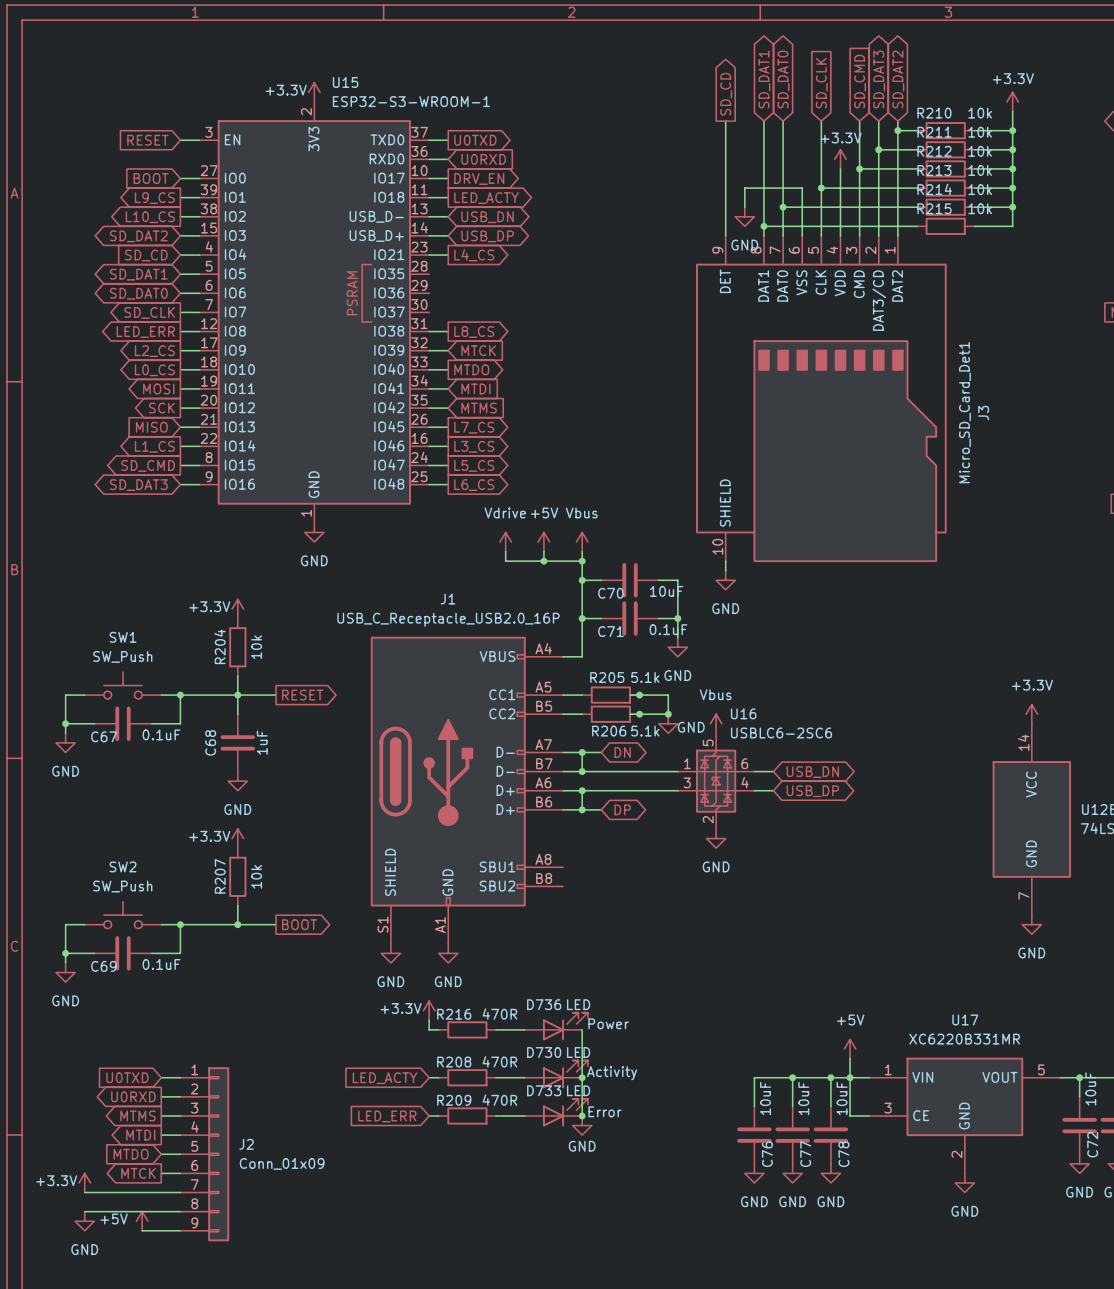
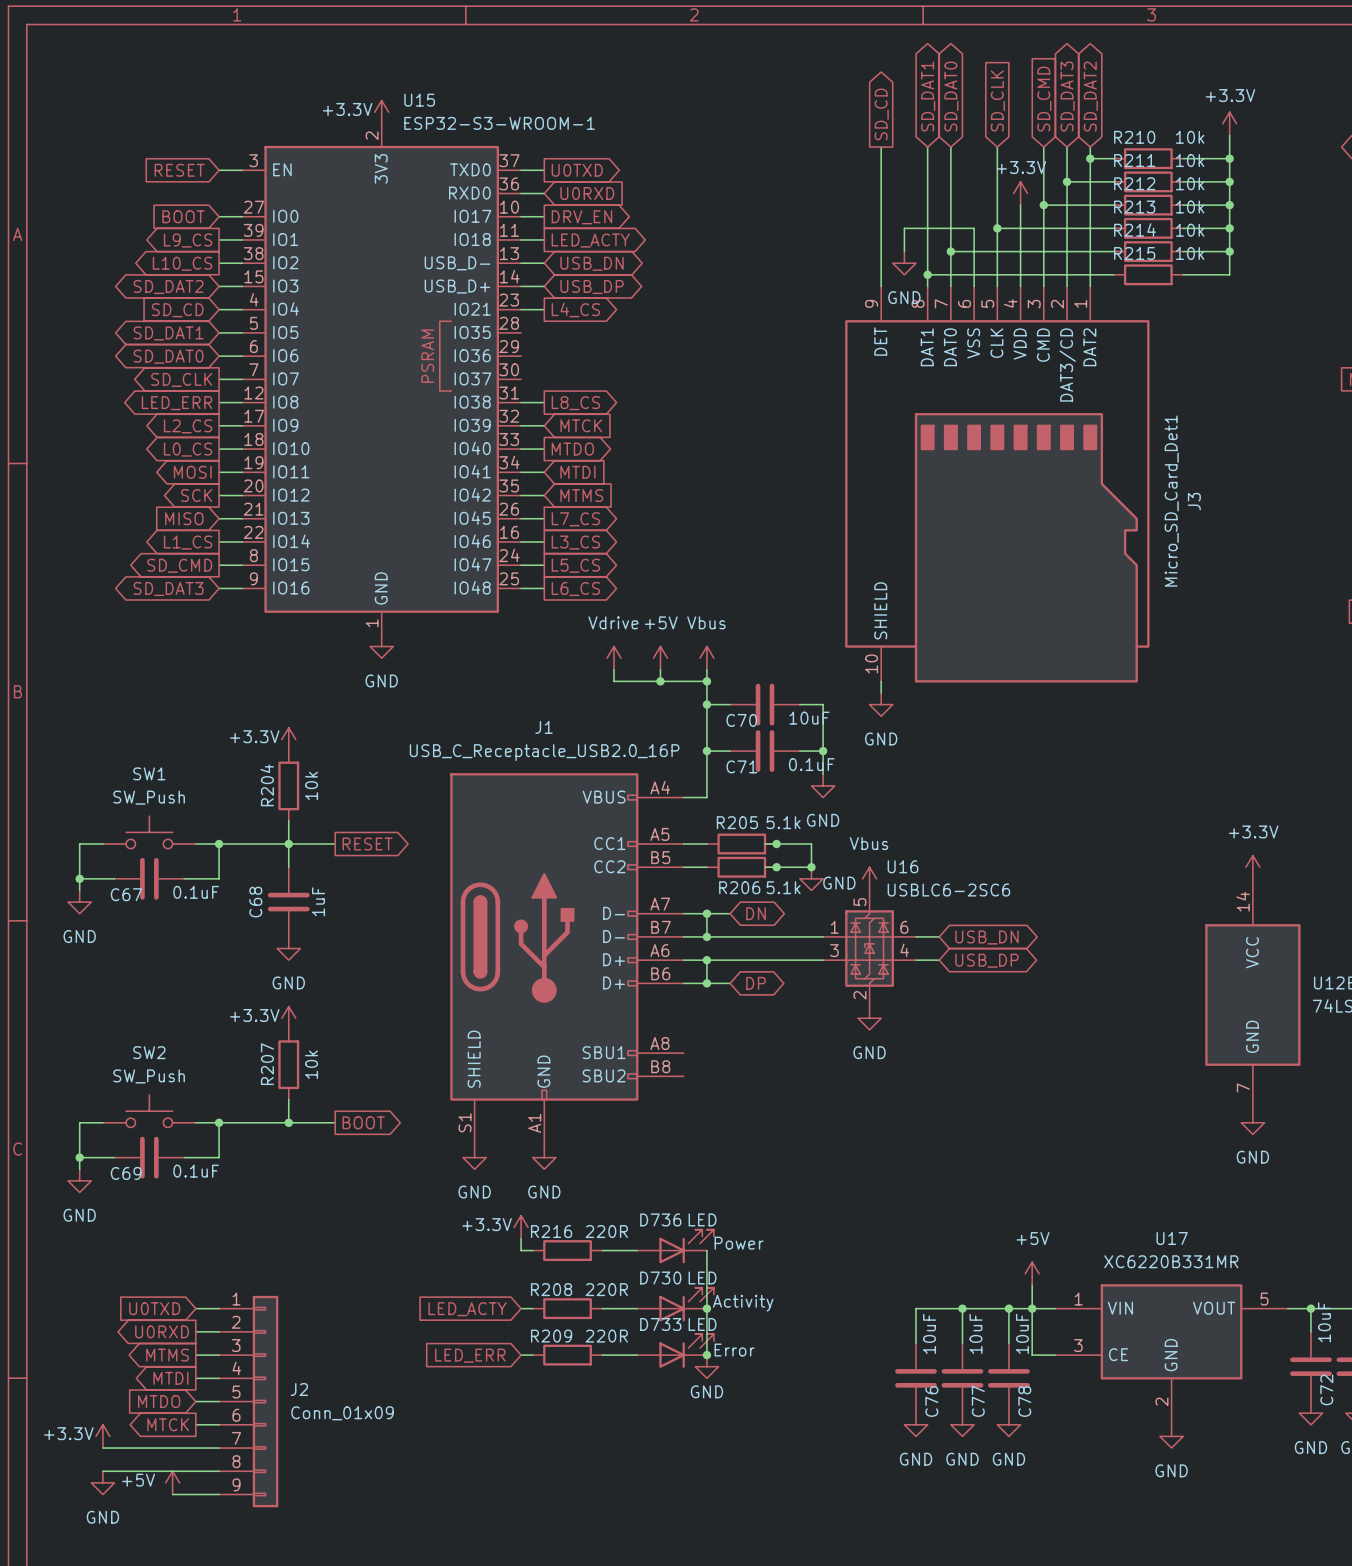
R216 value: 470R (499, 1014) -> 220R (606, 1231)
R208 value: 470R (499, 1061) -> 220R (606, 1289)
R209 value: 470R (499, 1100) -> 220R (606, 1336)

